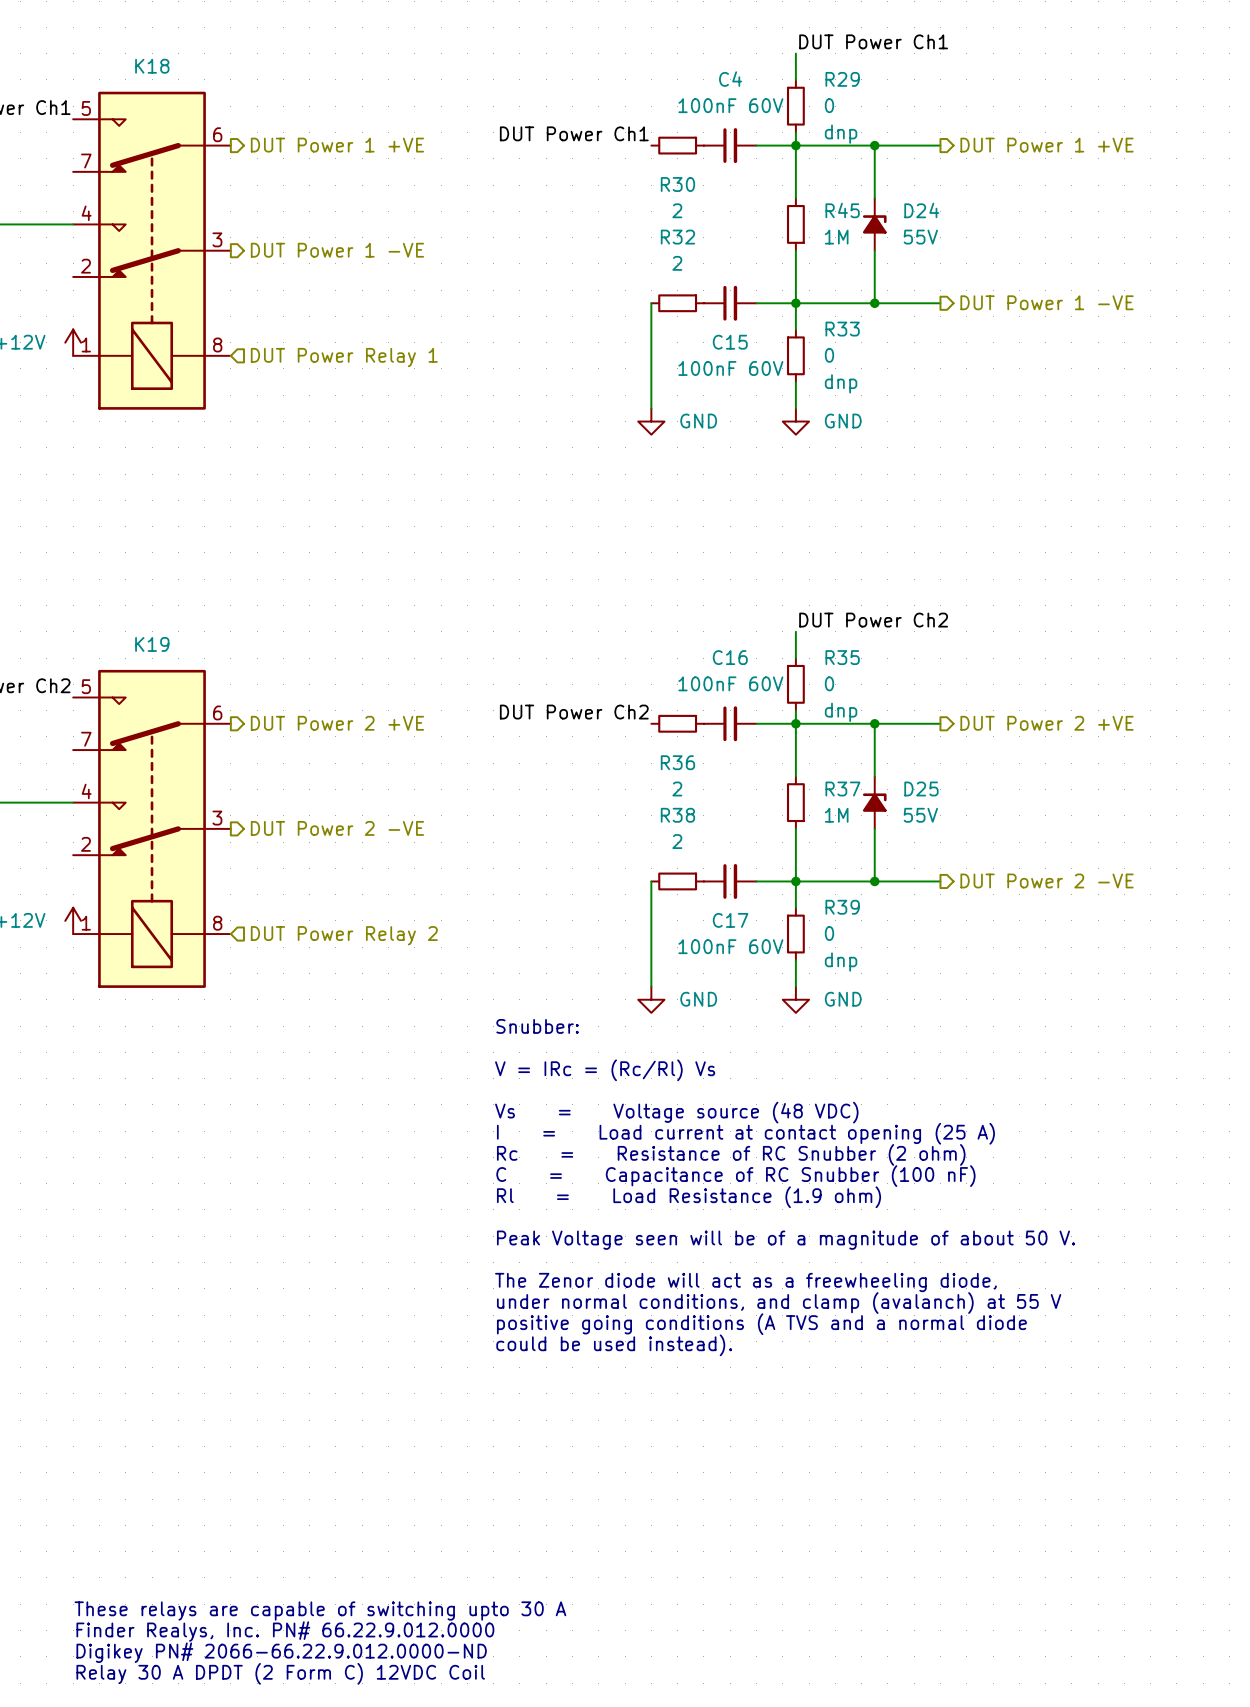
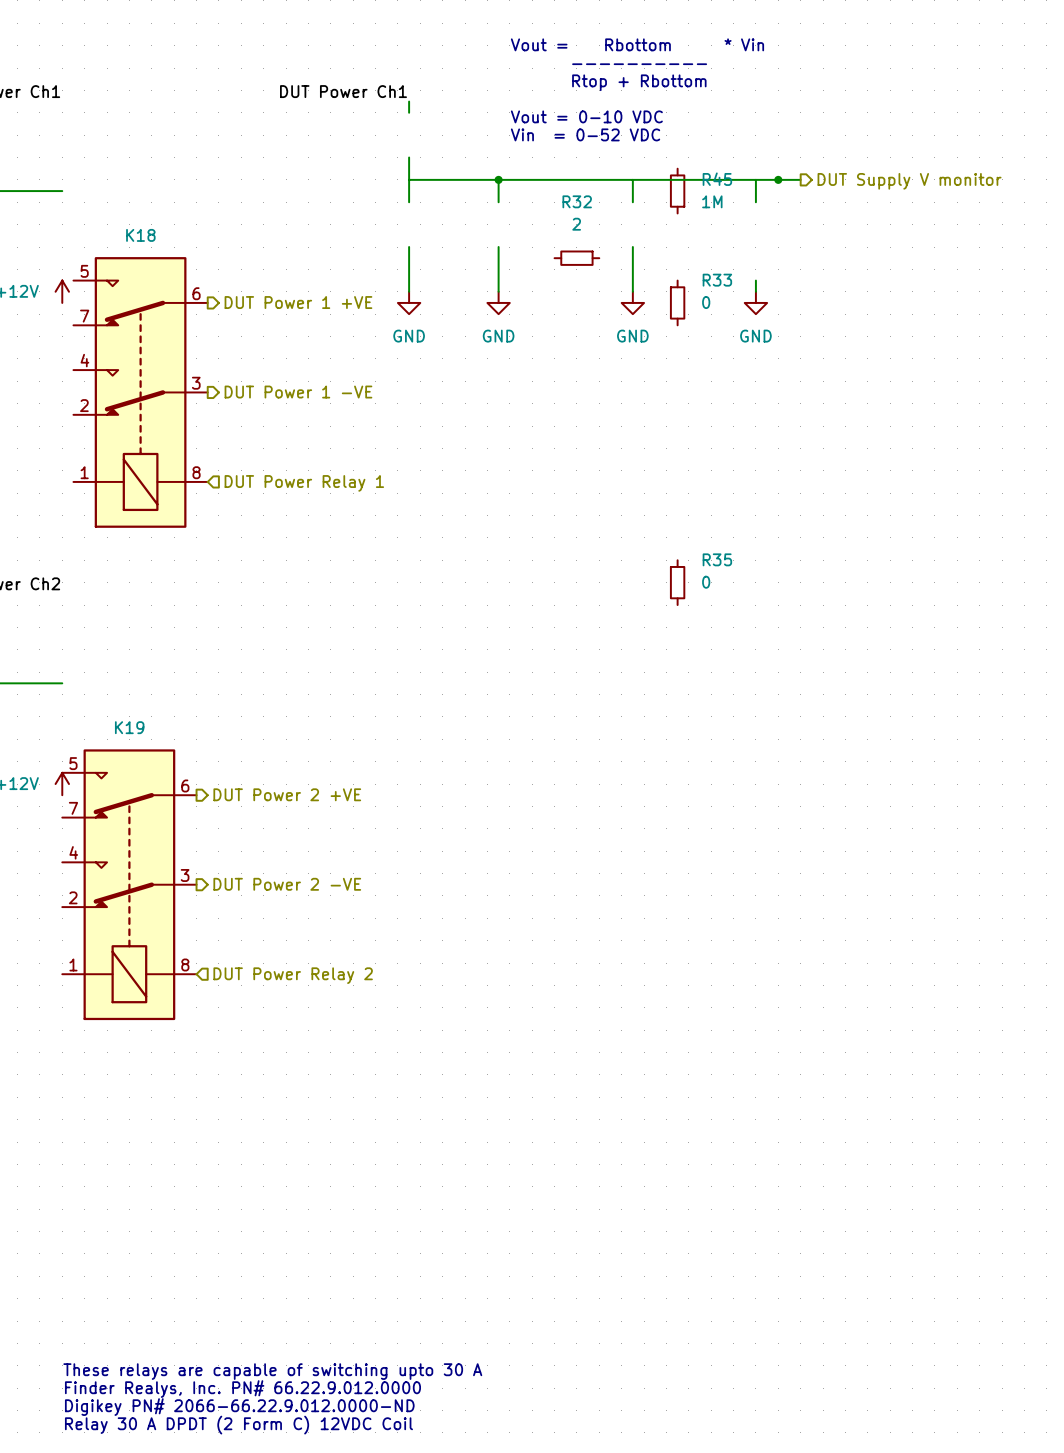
label: DUT Power Ch1 (873, 41) -> none
text: none -> Vout = Rbottom * Vin (637, 44)
wire: (795, 53) (795, 79) -> (632, 179) (632, 202)
text: none -> ---------- (639, 64)
text: none -> Rtop + Rbottom (639, 82)
R29: 0 (795, 106) -> none
wire: none -> (409, 101) (409, 112)
wire: (795, 132) (795, 198) -> none
label position: DUT Power Ch1 (574, 133) -> DUT Power Ch1 (343, 91)
text: none -> Vout = 0-10 VDC (586, 116)
hierarchical label position: DUT Power 1 +VE (337, 145) -> DUT Power 1 +VE (298, 302)
R30: 2 (677, 145) -> none
C4: 100nF 60V (730, 145) -> none
wire: (756, 145) (940, 145) -> none
junction: (795, 145) -> none
wire: (874, 145) (874, 198) -> none
junction: (874, 145) -> none
hierarchical label: DUT Power 1 +VE (1047, 145) -> none
text: none -> Vin = 0-52 VDC (585, 134)
wire: none -> (409, 157) (409, 202)
wire: none -> (409, 179) (800, 179)
wire: none -> (498, 179) (498, 202)
junction: none -> (498, 179)
junction: none -> (778, 179)
hierarchical label: none -> DUT Supply V monitor (909, 181)
D24: 55V (874, 224) -> none
K18 position: (152, 250) -> (140, 392)
hierarchical label position: DUT Power 1 -VE (337, 250) -> DUT Power 1 -VE (298, 392)
wire: (795, 250) (795, 329) -> none
wire: (874, 250) (874, 303) -> (632, 247) (632, 291)
wire: none -> (409, 247) (409, 291)
wire: none -> (498, 247) (498, 291)
hierarchical label: DUT Power 1 -VE (1047, 302) -> none
wire: (651, 303) (651, 408) -> none
C15: 100nF 60V (730, 303) -> none
wire: (756, 303) (940, 303) -> none
junction: (795, 303) -> none
junction: (874, 303) -> none
wire: none -> (755, 280) (755, 291)
power symbol: none -> GND (409, 302)
power symbol: none -> GND (498, 302)
power symbol: none -> GND (632, 302)
power symbol: none -> GND (755, 302)
hierarchical label position: DUT Power Relay 1 (344, 357) -> DUT Power Relay 1 (304, 483)
wire: (795, 382) (795, 408) -> (755, 179) (755, 202)
R33 text: dnp (841, 383) -> none
power symbol: GND (651, 421) -> none
power symbol: GND (795, 421) -> none
label: DUT Power Ch2 (873, 620) -> none
wire: (795, 631) (795, 658) -> none
wire: (795, 710) (795, 776) -> none
label: DUT Power Ch2 (574, 712) -> none
R35 text: dnp (841, 712) -> none
hierarchical label: DUT Power 2 +VE (337, 723) -> none
R36: 2 (677, 723) -> none
C16: 100nF 60V (730, 723) -> none
wire: (756, 723) (940, 723) -> none
junction: (795, 723) -> none
wire: (874, 723) (874, 776) -> none
junction: (874, 723) -> none
hierarchical label: DUT Power 2 +VE (1047, 723) -> none
R37: 1M (795, 802) -> none
D25: 55V (874, 802) -> none
K19 position: (152, 828) -> (129, 884)
hierarchical label position: DUT Power 2 -VE (337, 828) -> DUT Power 2 -VE (287, 884)
wire: (795, 828) (795, 907) -> none
wire: (874, 828) (874, 881) -> none
hierarchical label: DUT Power 2 -VE (1047, 880) -> none
wire: (651, 881) (651, 986) -> none
R38: 2 (677, 881) -> none
C17: 100nF 60V (730, 881) -> none
wire: (756, 881) (940, 881) -> none
junction: (795, 881) -> none
junction: (874, 881) -> none
R39: 0 (795, 934) -> none
hierarchical label shape: input (344, 935) -> output (287, 794)
hierarchical label: DUT Power Relay 2 (344, 935) -> DUT Power 2 +VE (287, 794)
wire: (795, 960) (795, 986) -> none
power symbol: GND (651, 999) -> none
power symbol: GND (795, 999) -> none
text: Snubber: (537, 1026) -> none
text: V = IRc = (Rc/Rl) Vs (605, 1070) -> none
text: Vs = Voltage source (48 VDC) (676, 1112) -> none
text: I = Load current at contact opening (25 A) (745, 1133) -> none
hierarchical label: none -> DUT Power Relay 2 (293, 975)
text: Rc = Resistance of RC Snubber (2 ohm) (731, 1154) -> none
text: C = Capacitance of RC Snubber (100 nF) (735, 1176) -> none
text: Rl = Load Resistance (1.9 ohm) (689, 1197) -> none
text: Peak Voltage seen will be of a magnitude of about 50 V. (785, 1240) -> none
text: The Zenor diode will act as a freewheeling diode, (745, 1282) -> none
text: under normal conditions, and clamp (avalanch) at 55 V (779, 1303) -> none
text: positive going conditions (A TVS and a normal diode (761, 1324) -> none
text: could be used instead). (614, 1345) -> none

